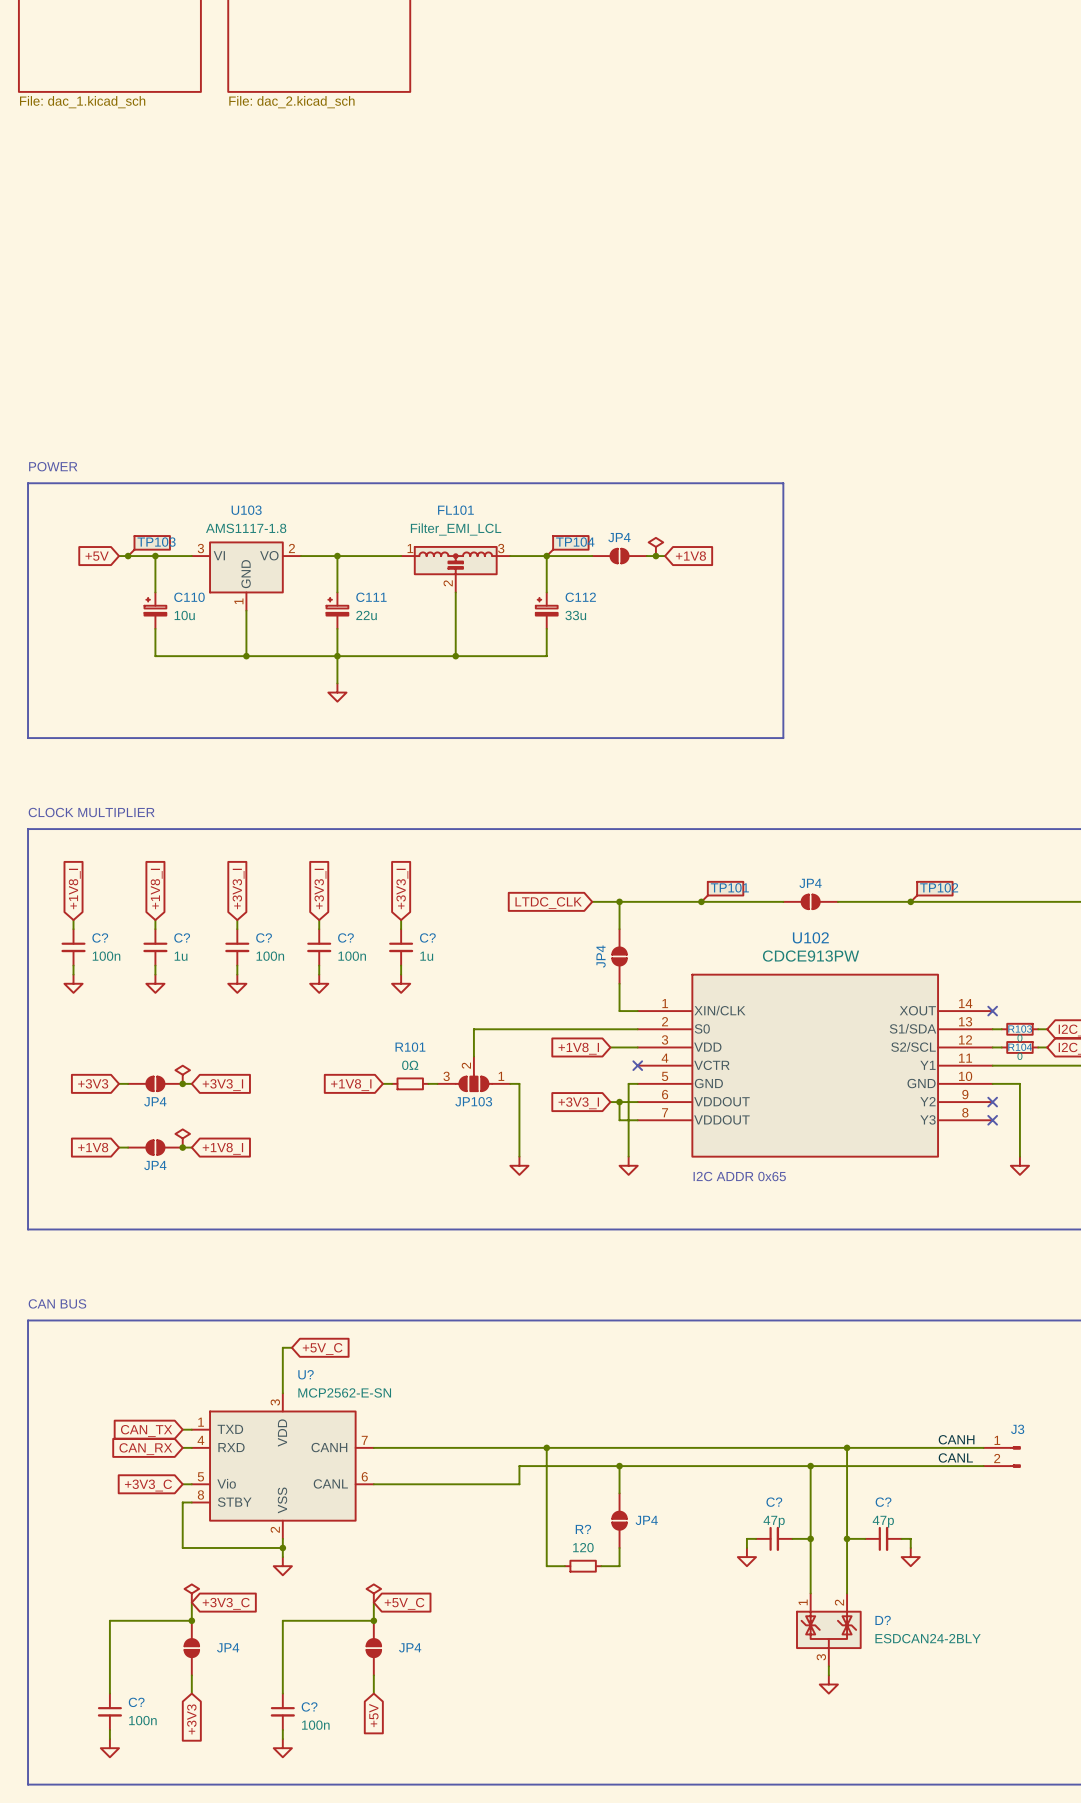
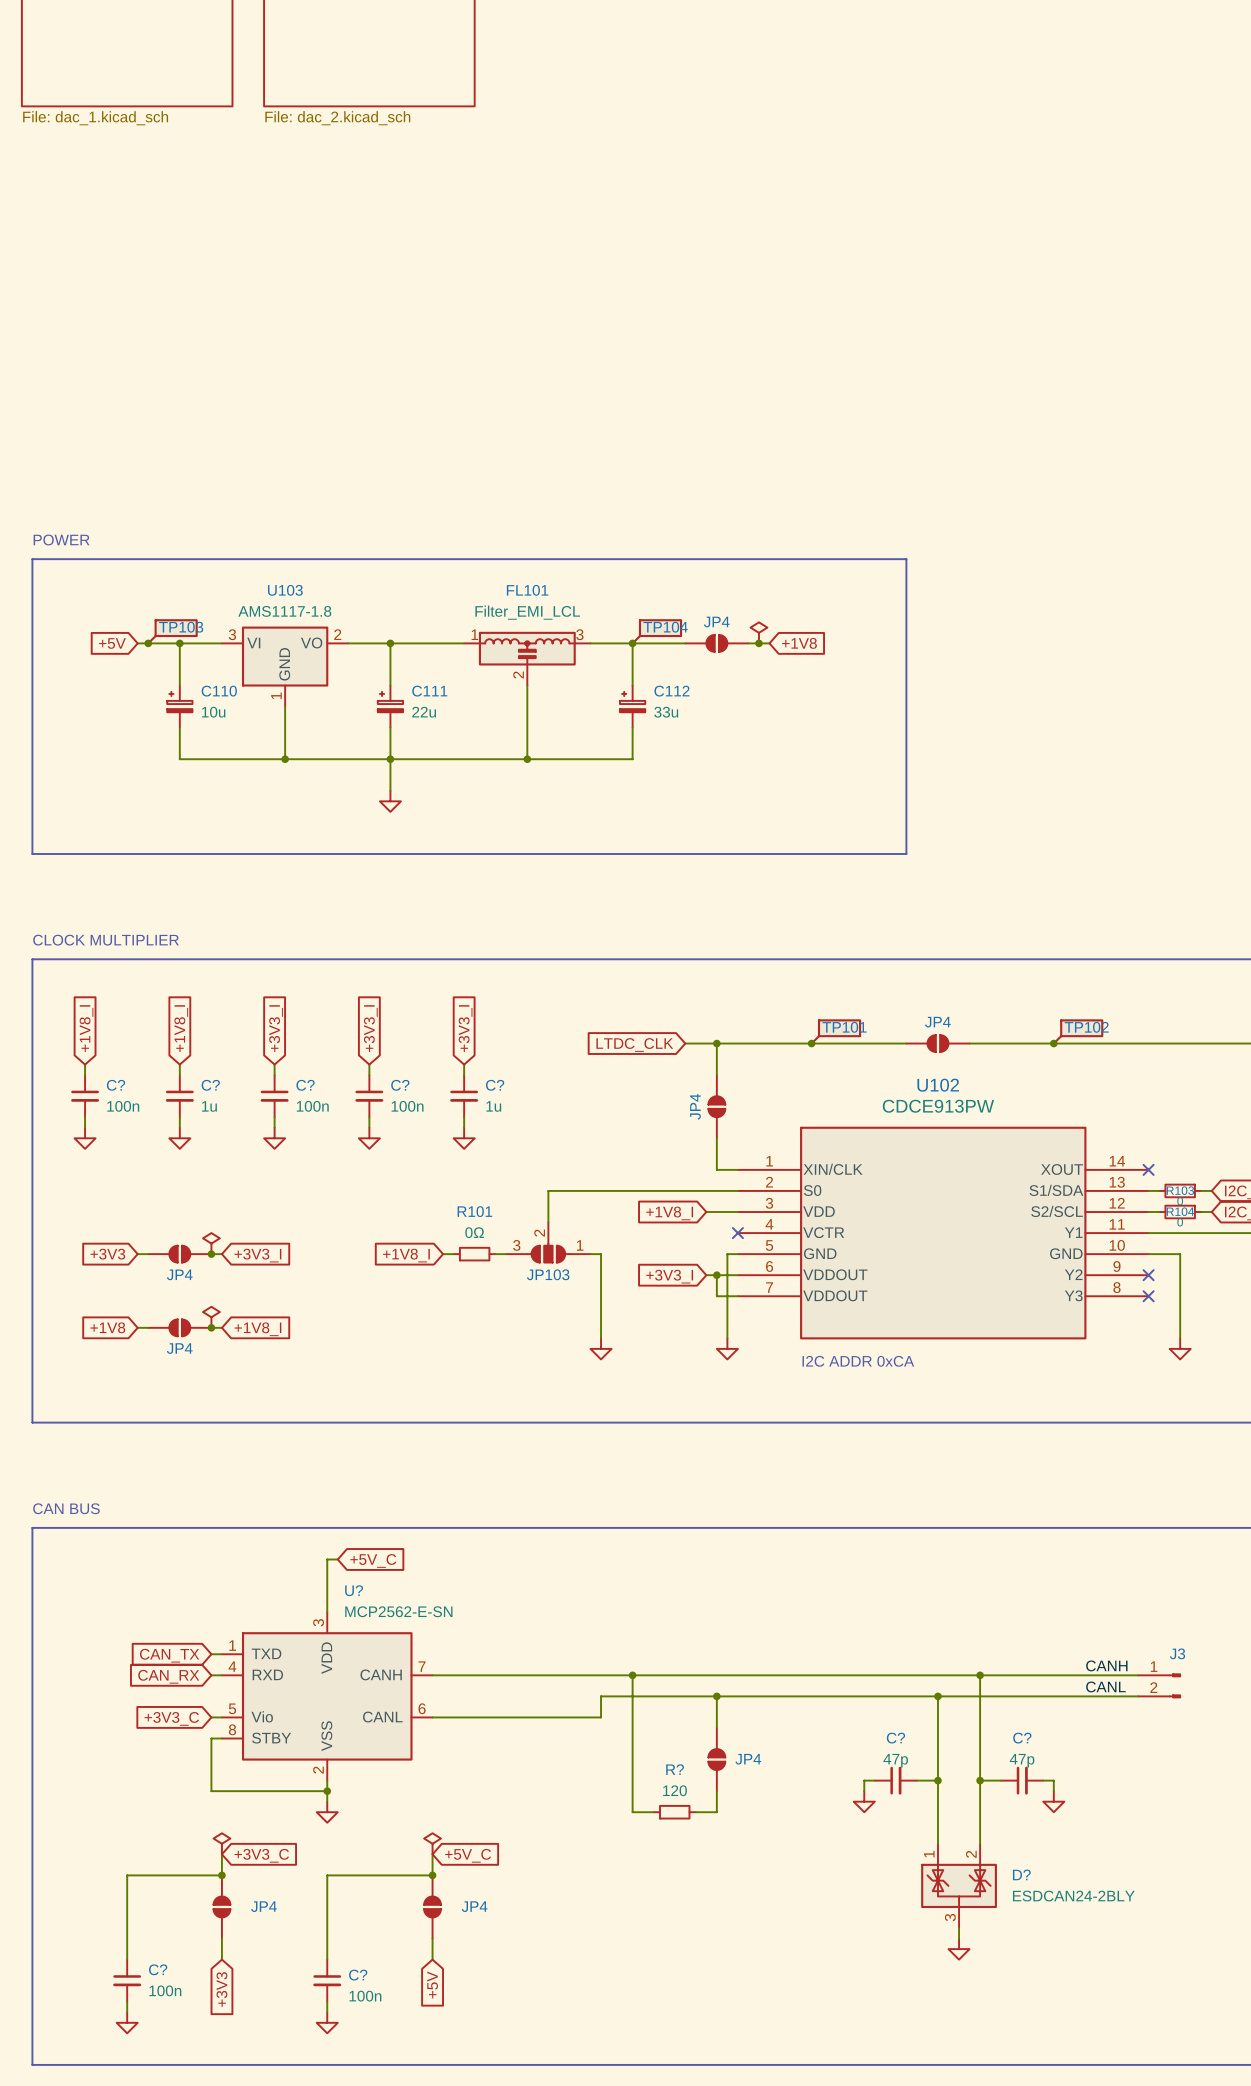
text: I2C ADDR 0x65 (739, 1176) -> I2C ADDR 0xCA (858, 1361)

